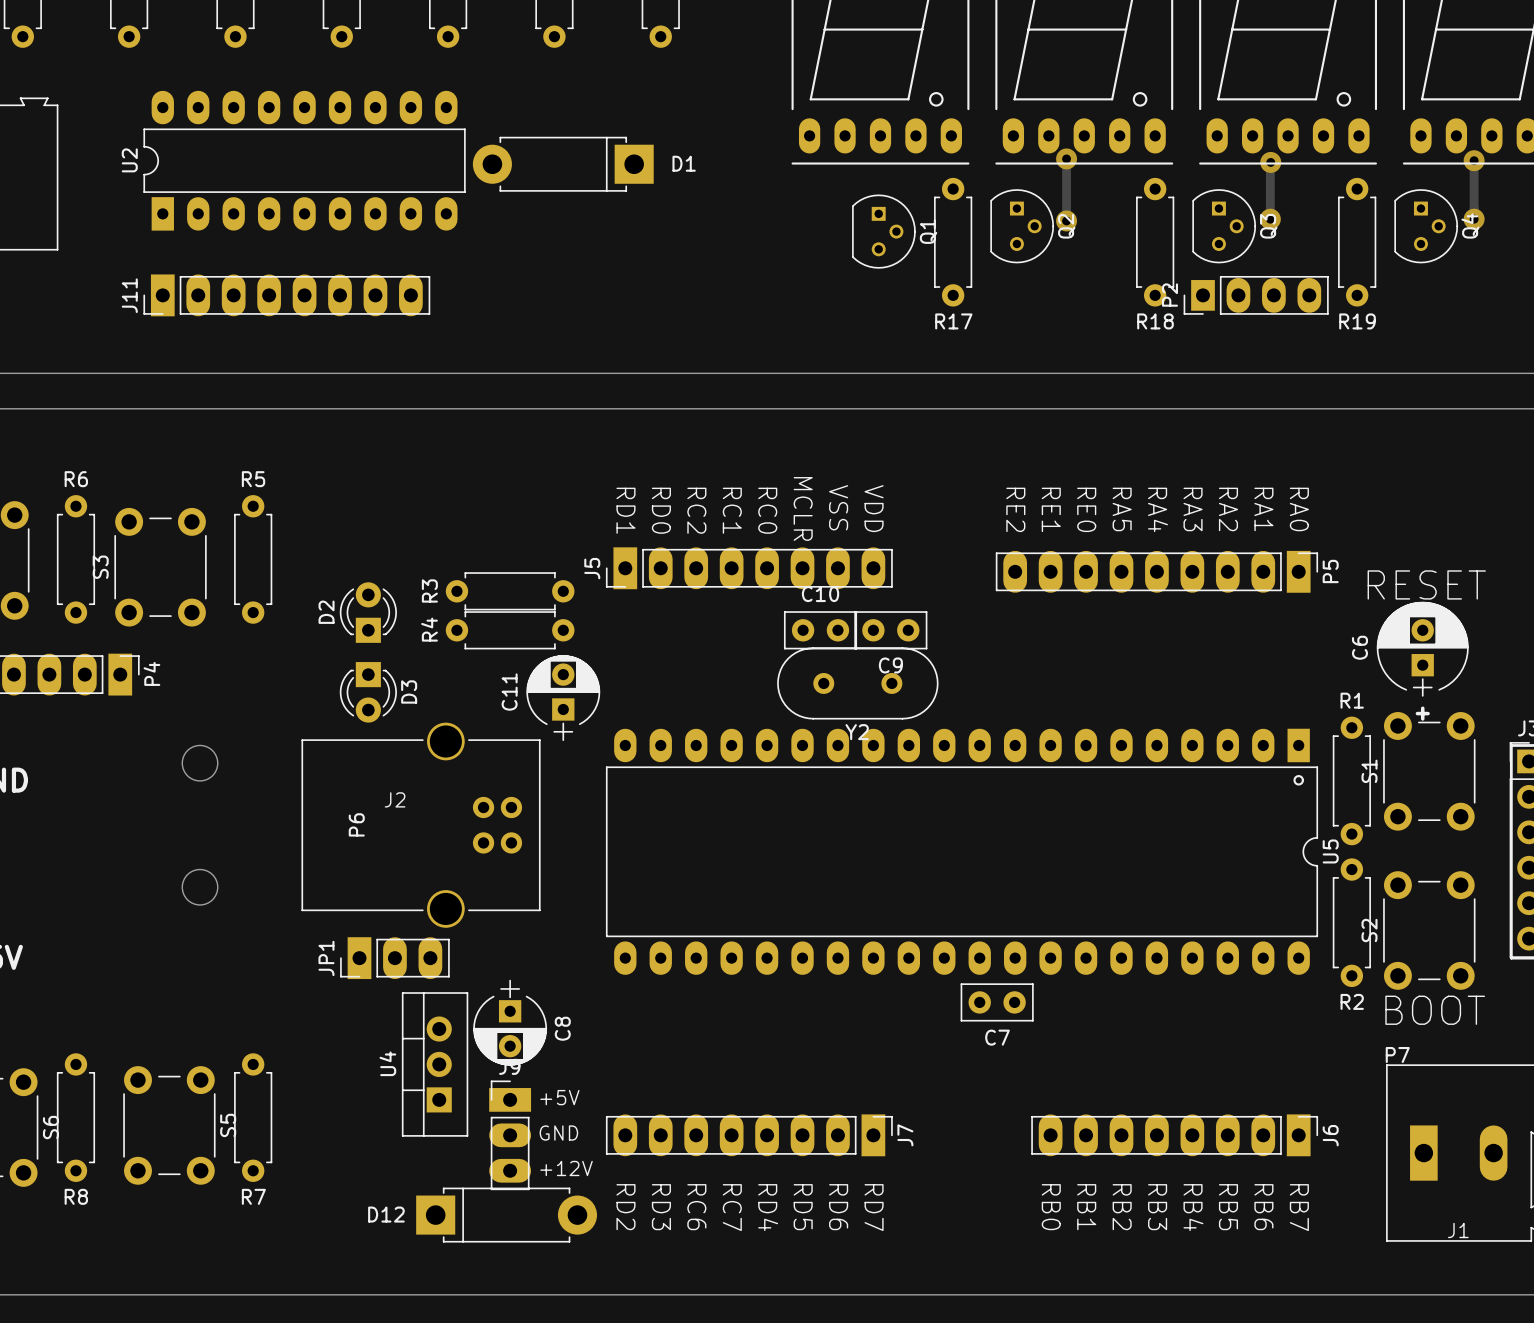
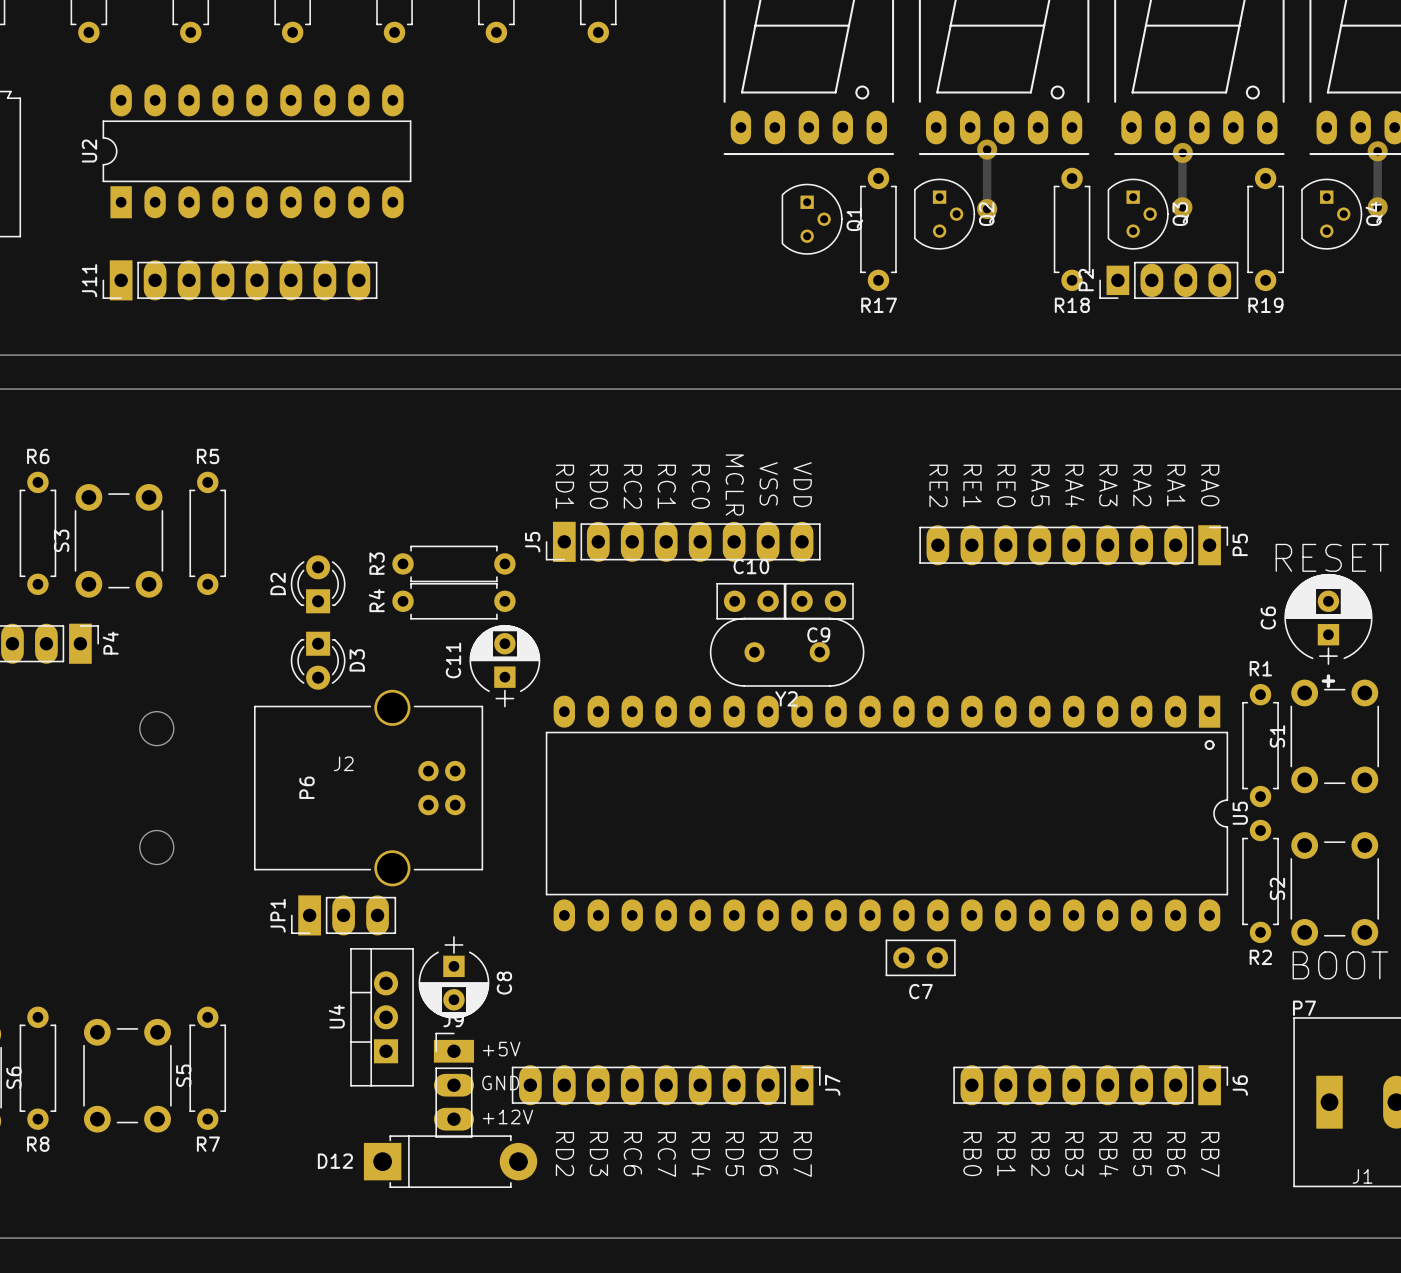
D1: (563, 164) -> none
J7 footprint: [605, 1114, 893, 1157] -> [511, 1065, 821, 1106]

